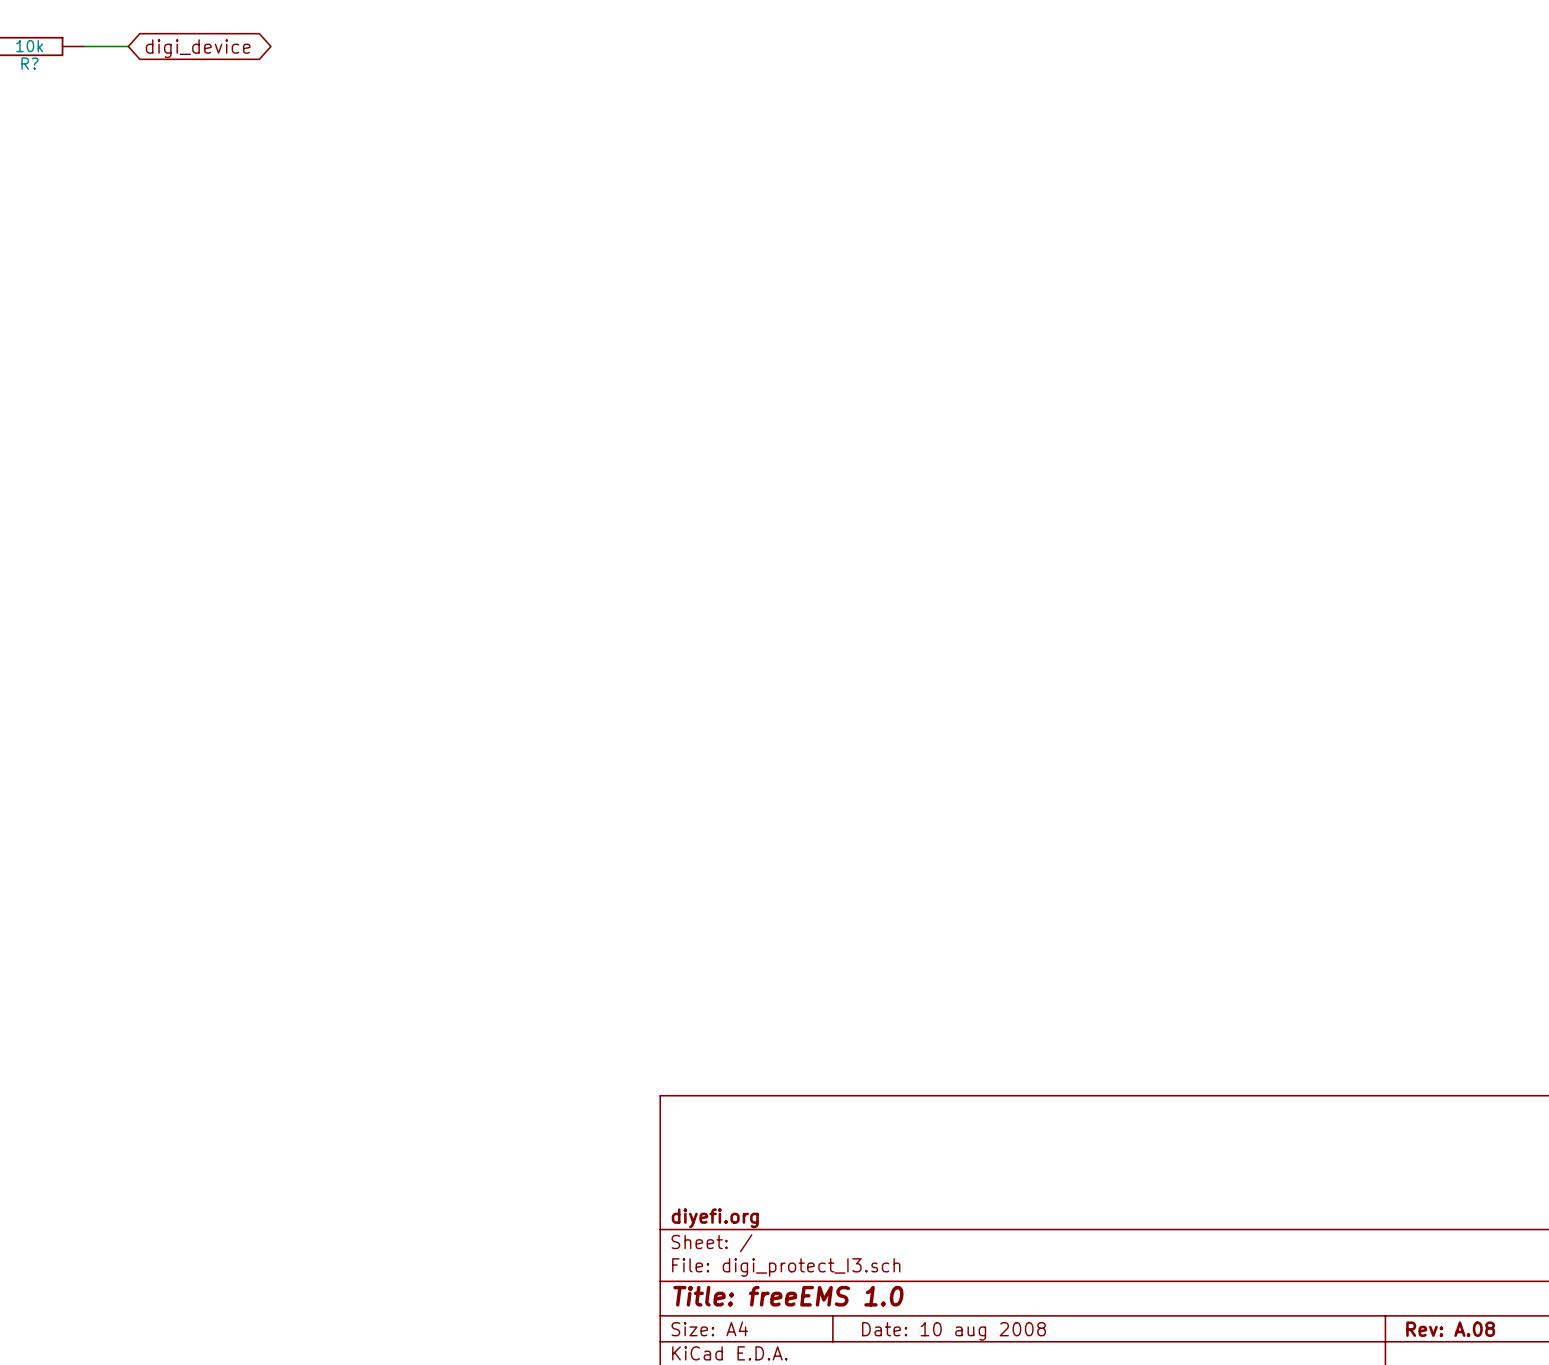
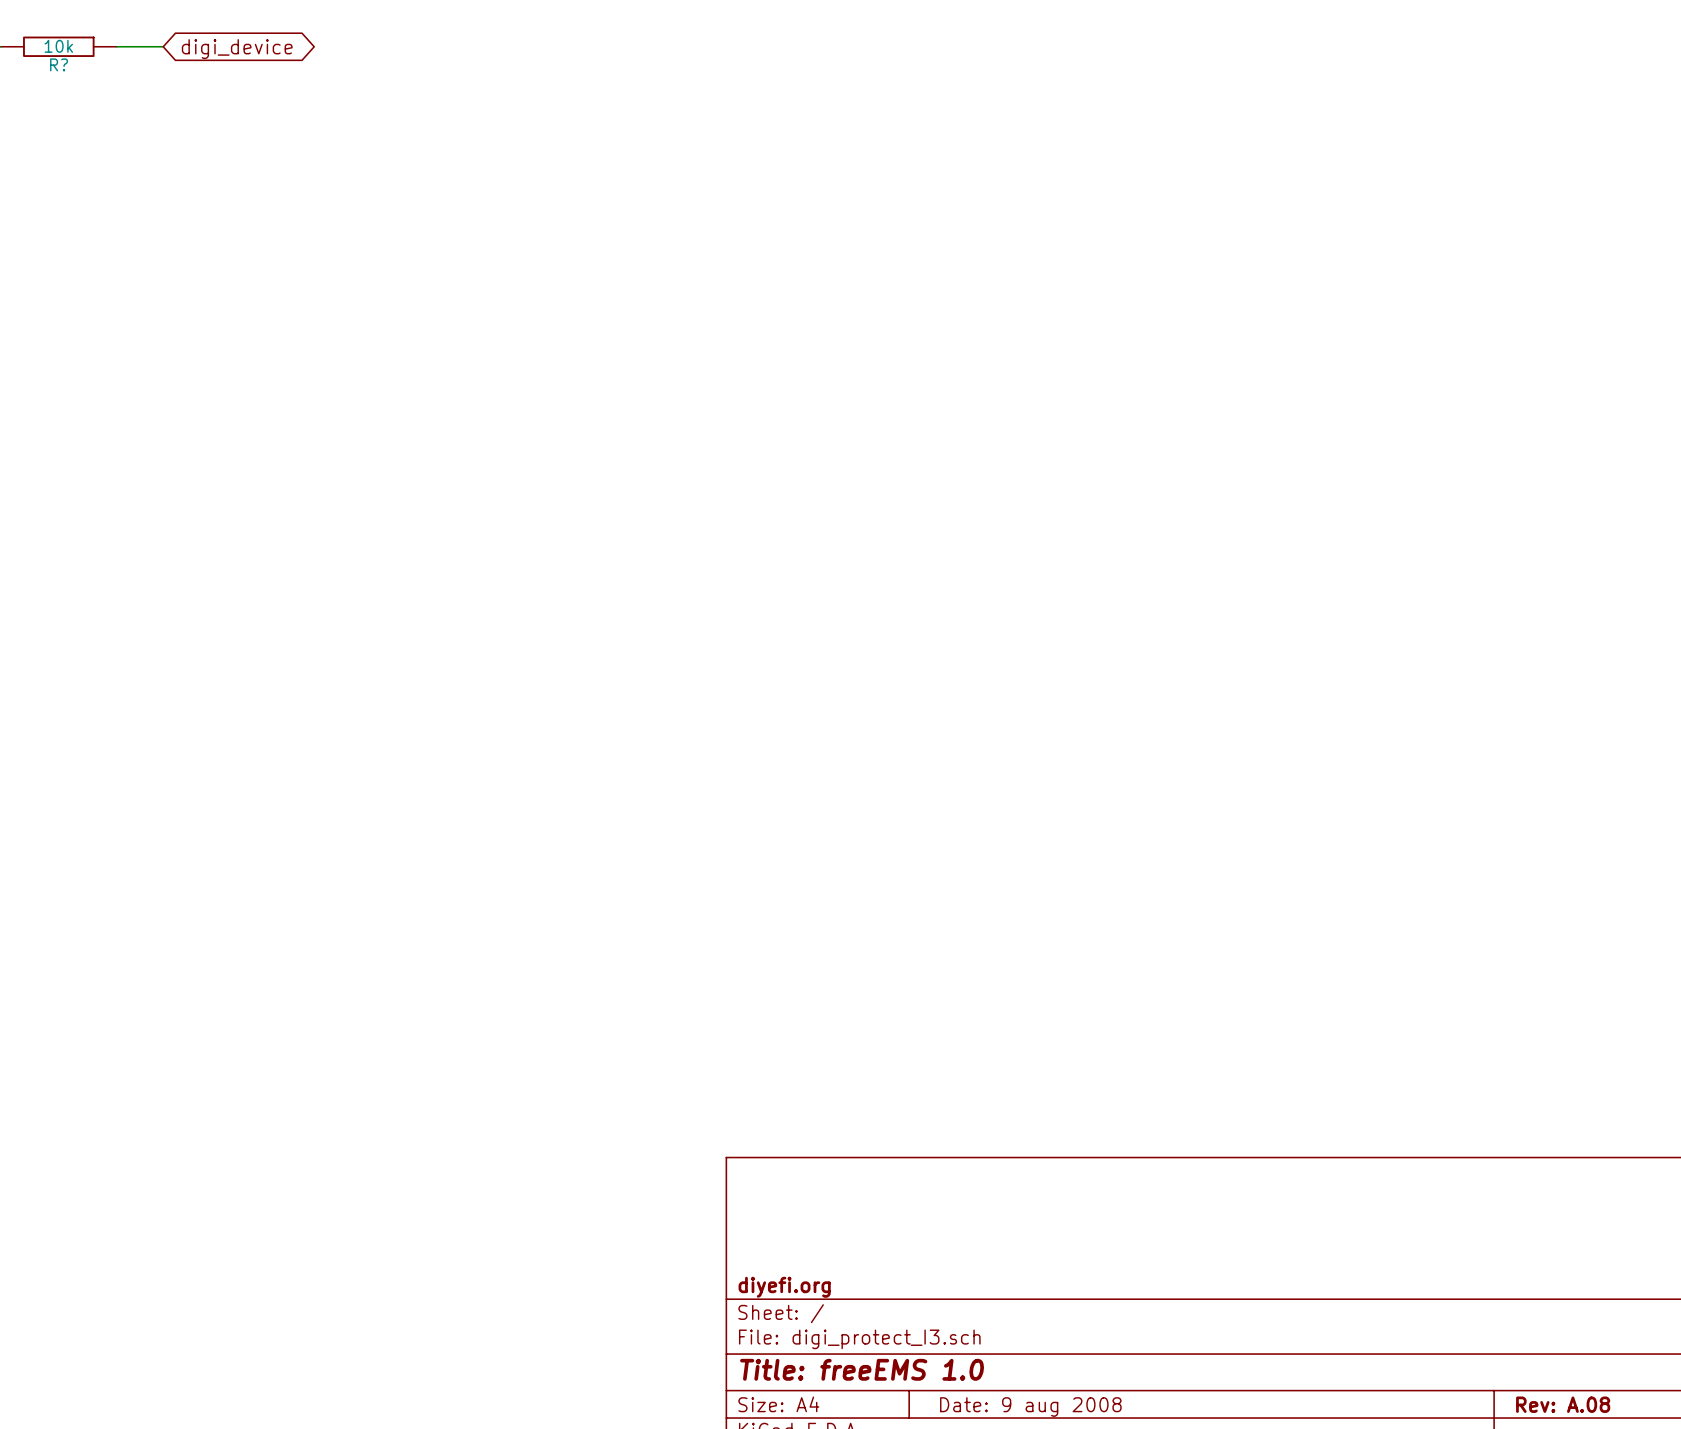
title block: Date: 10 aug 2008 (954, 1331) -> Date: 9 aug 2008 (1030, 1406)

